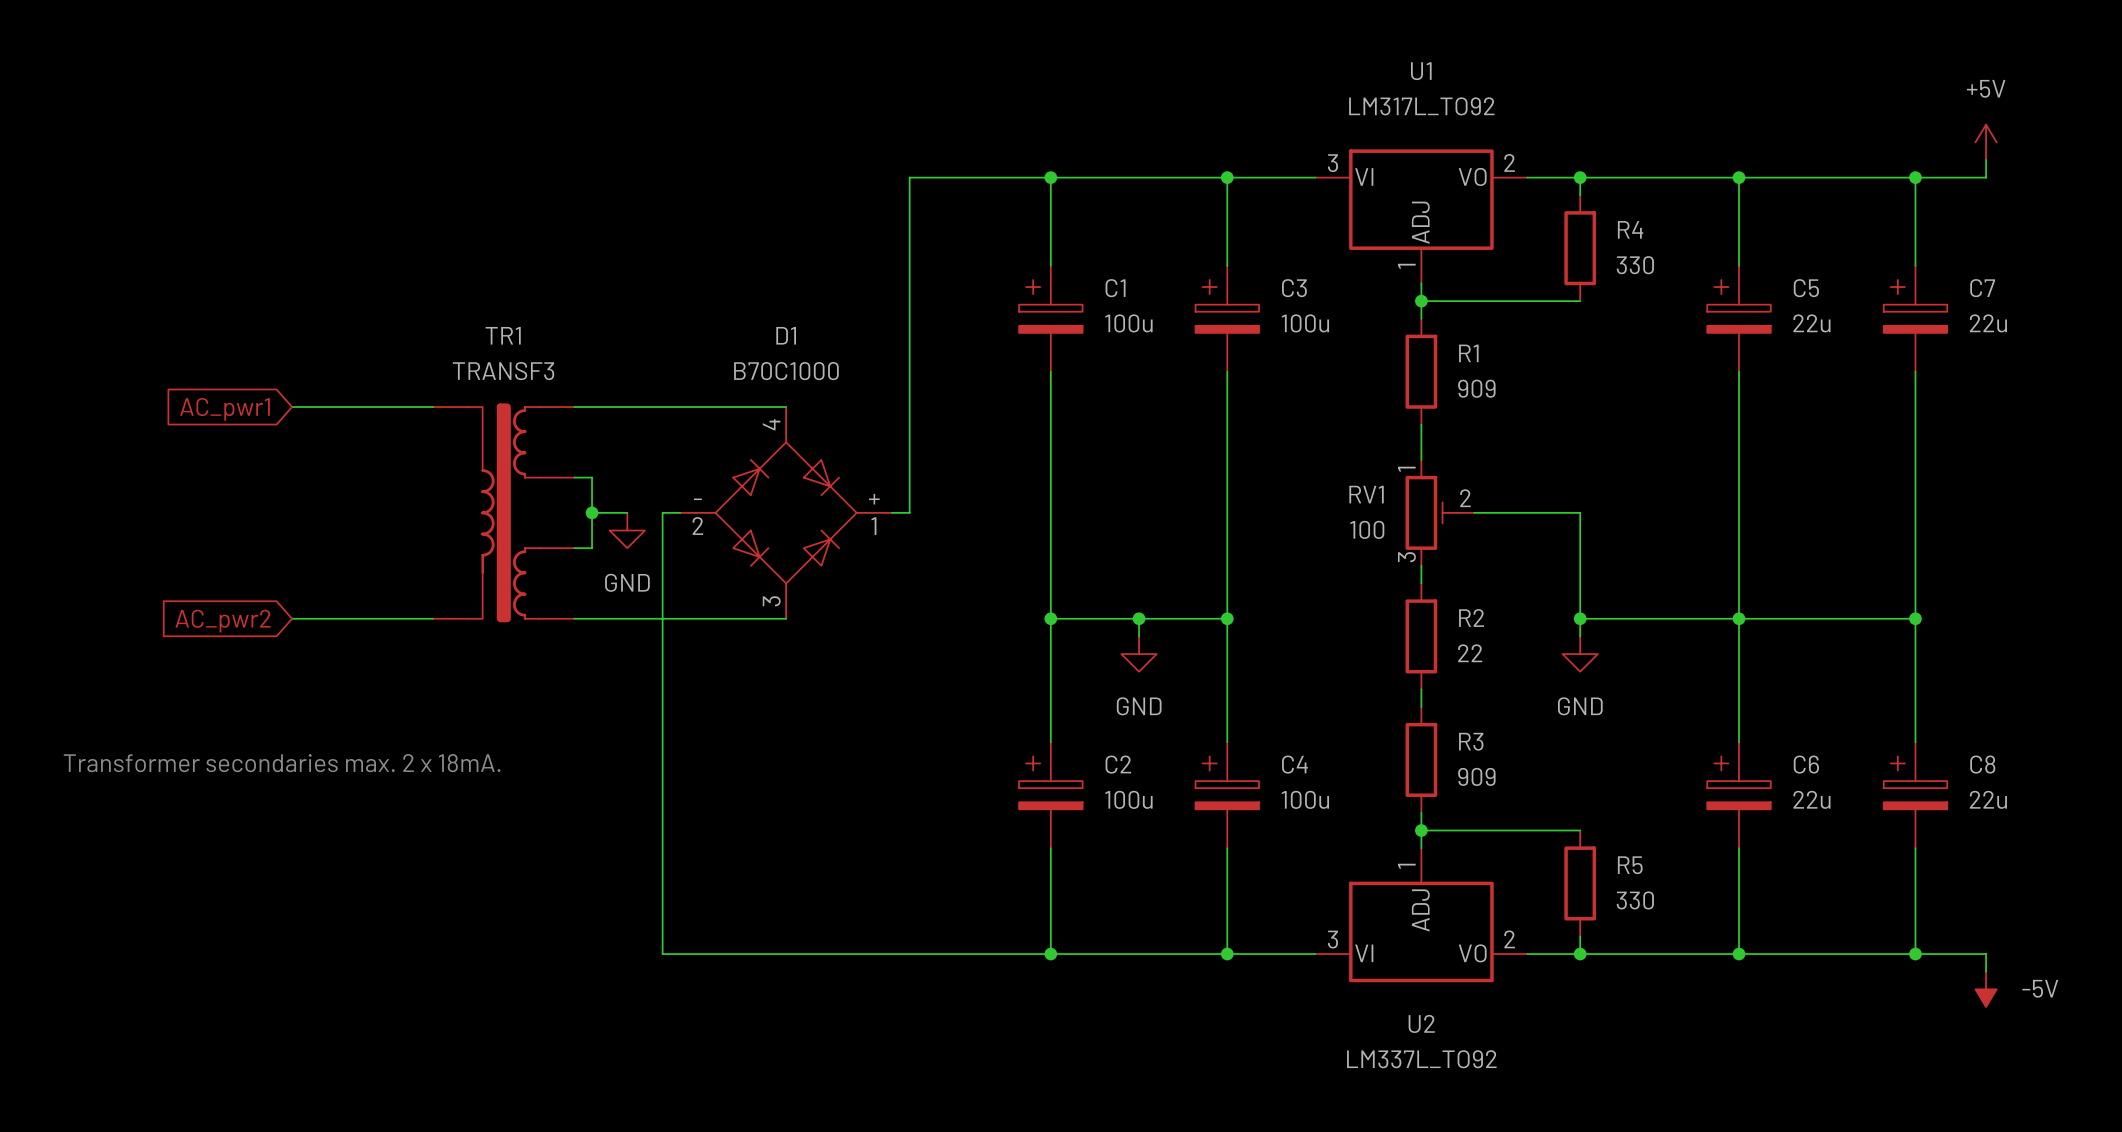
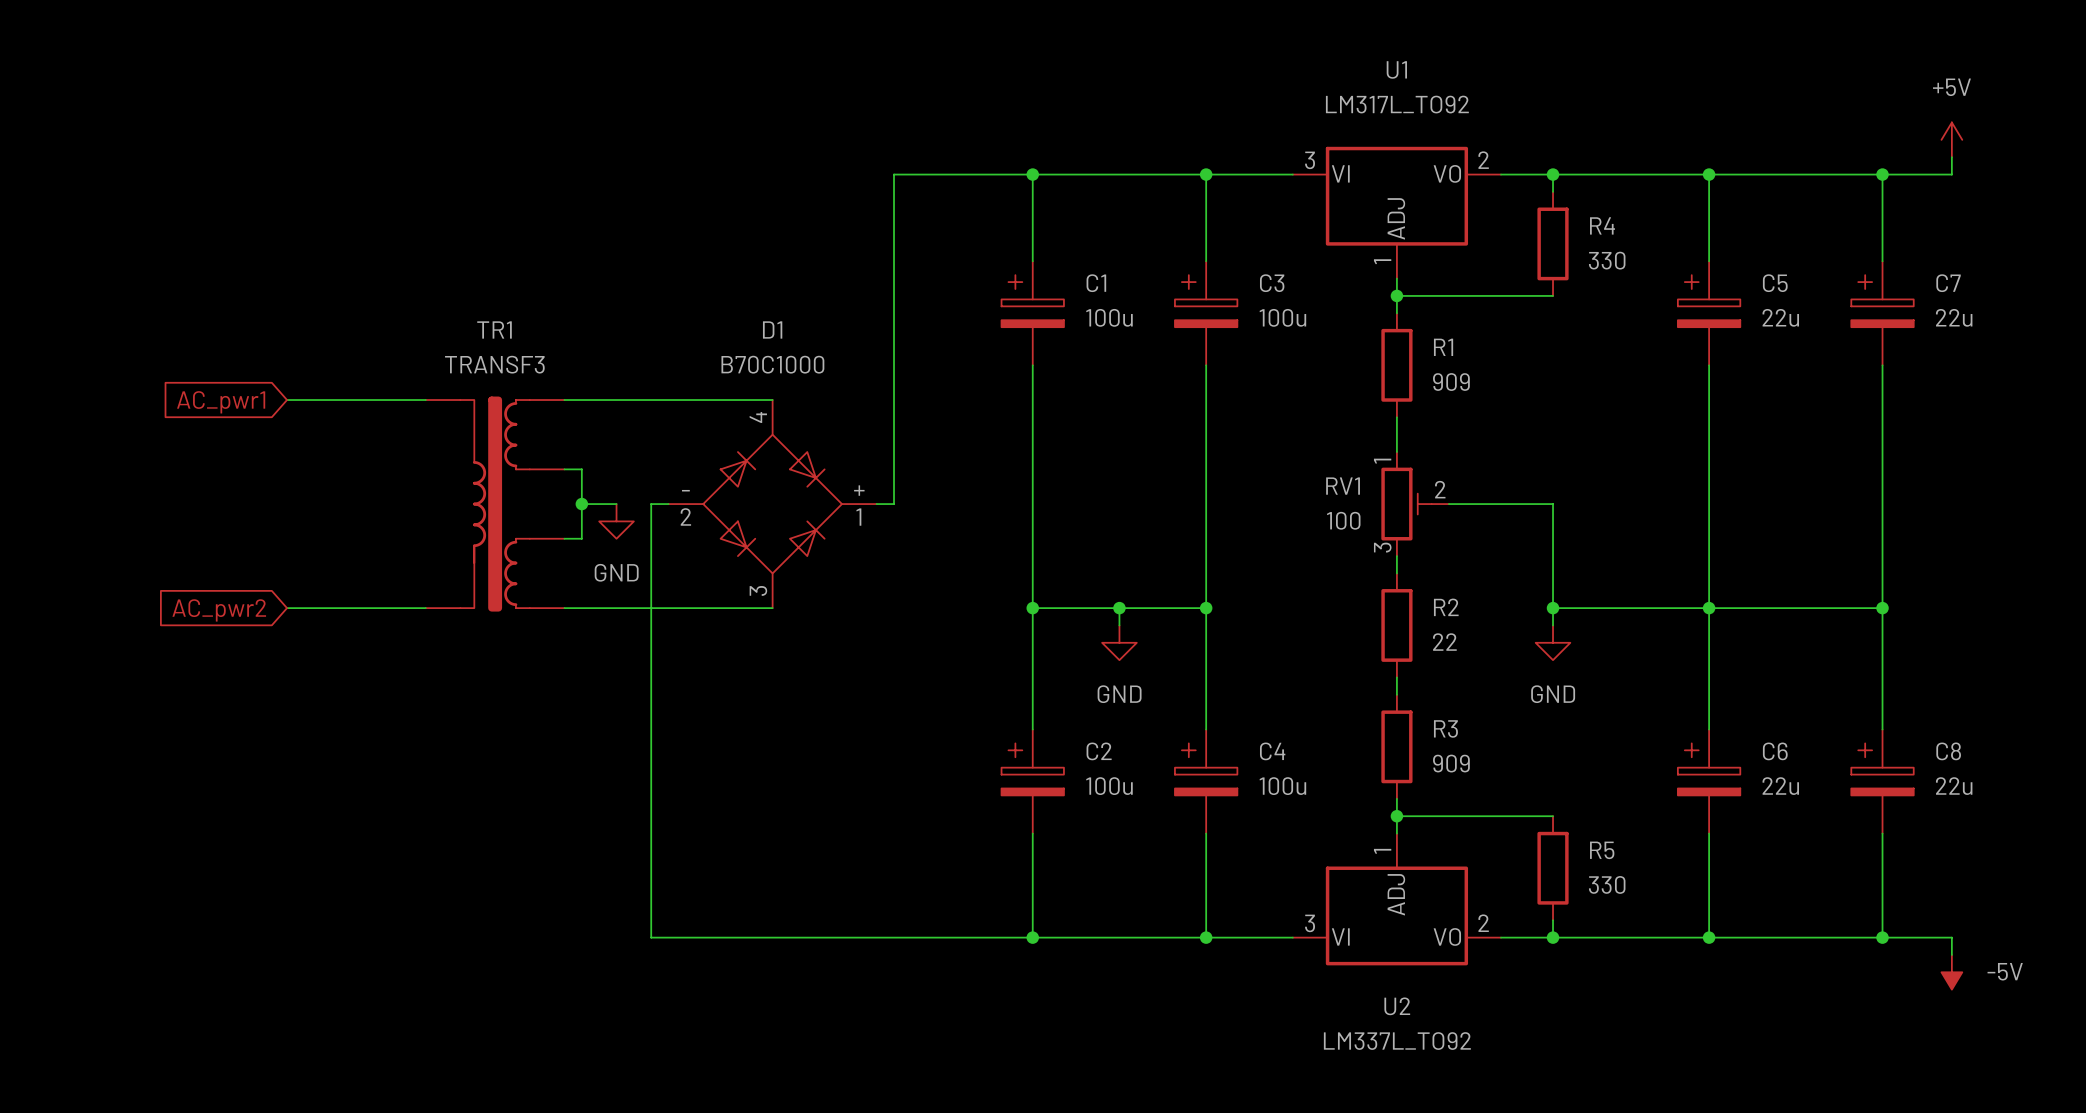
text: Transformer secondaries max. 2 x 18mA. (282, 763) -> none

